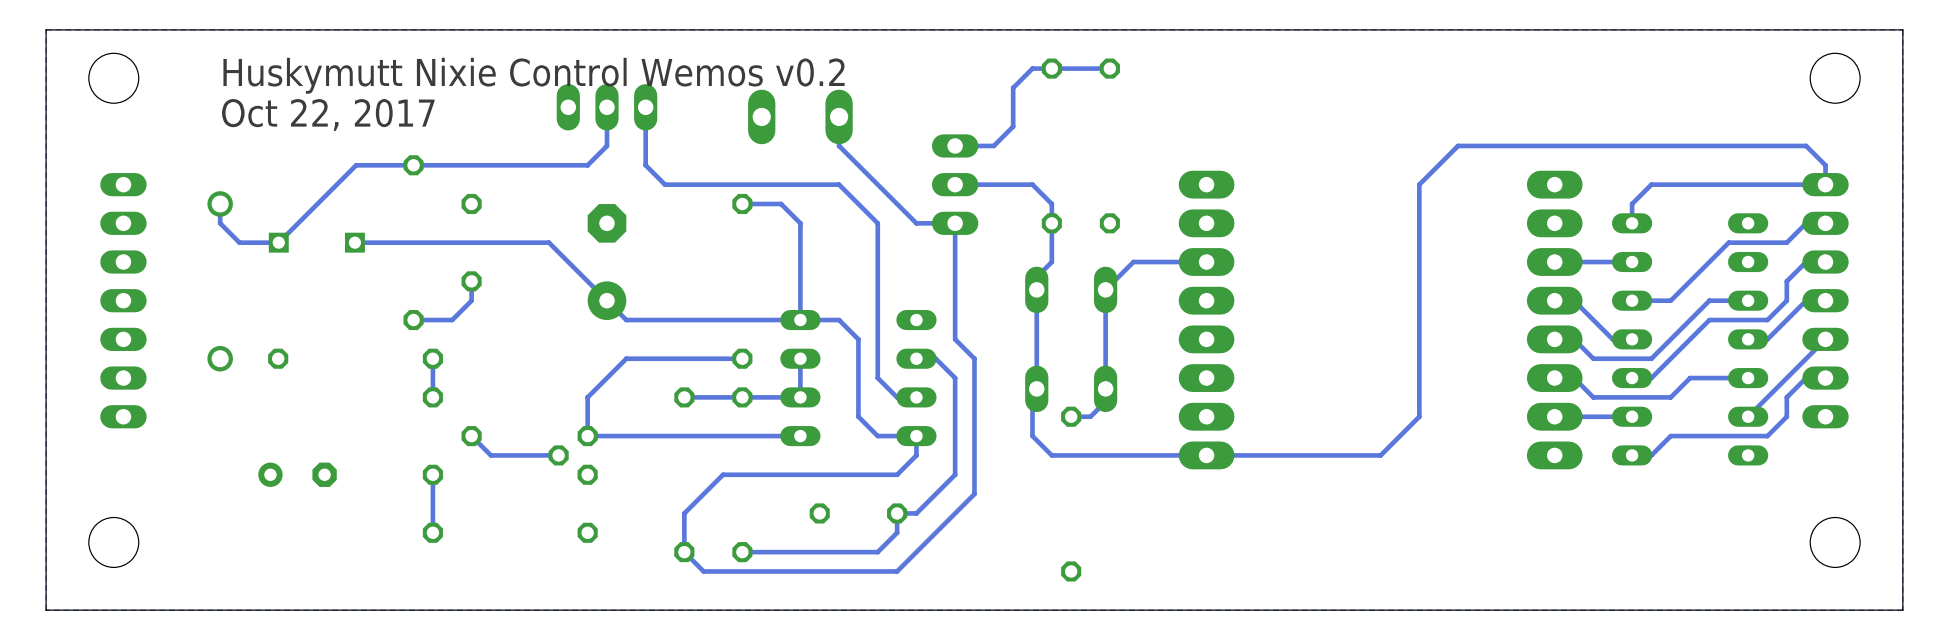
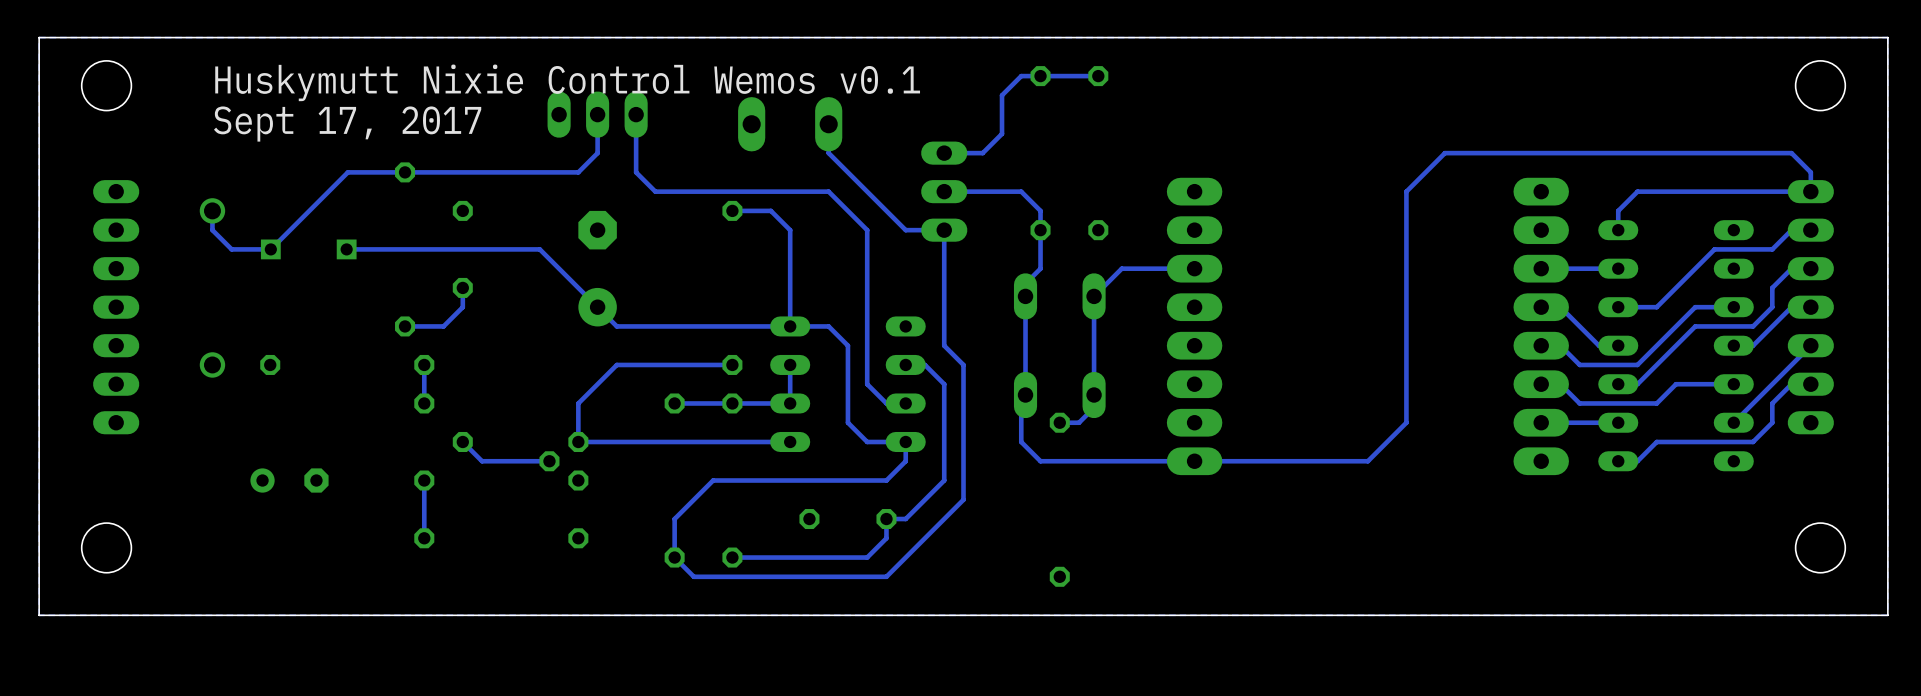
text: Huskymutt Nixie Control Wemos v0.2 (534, 75) -> Huskymutt Nixie Control Wemos v0.1 (567, 82)
text: Oct 22, 2017 (328, 114) -> Sept 17, 2017 (347, 124)

